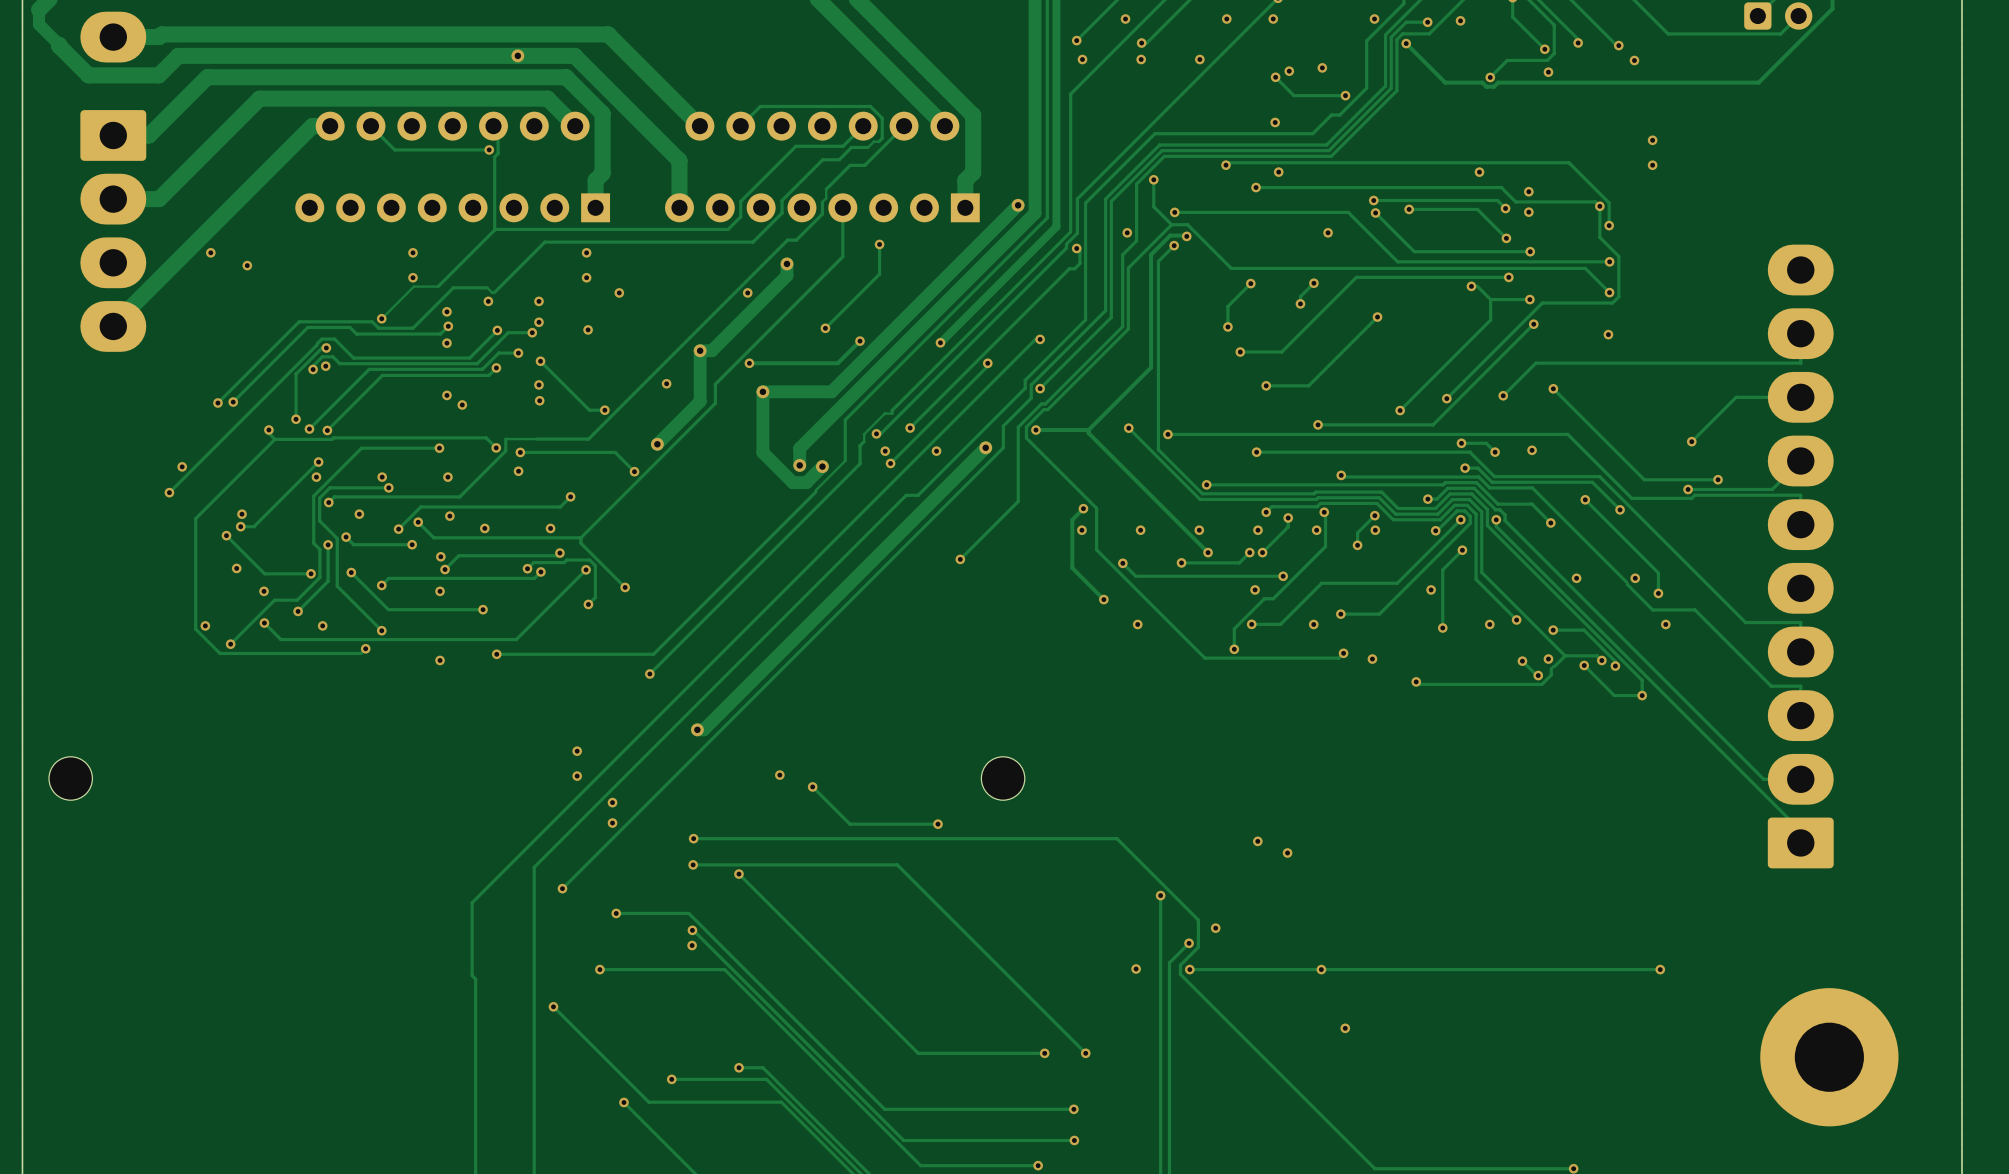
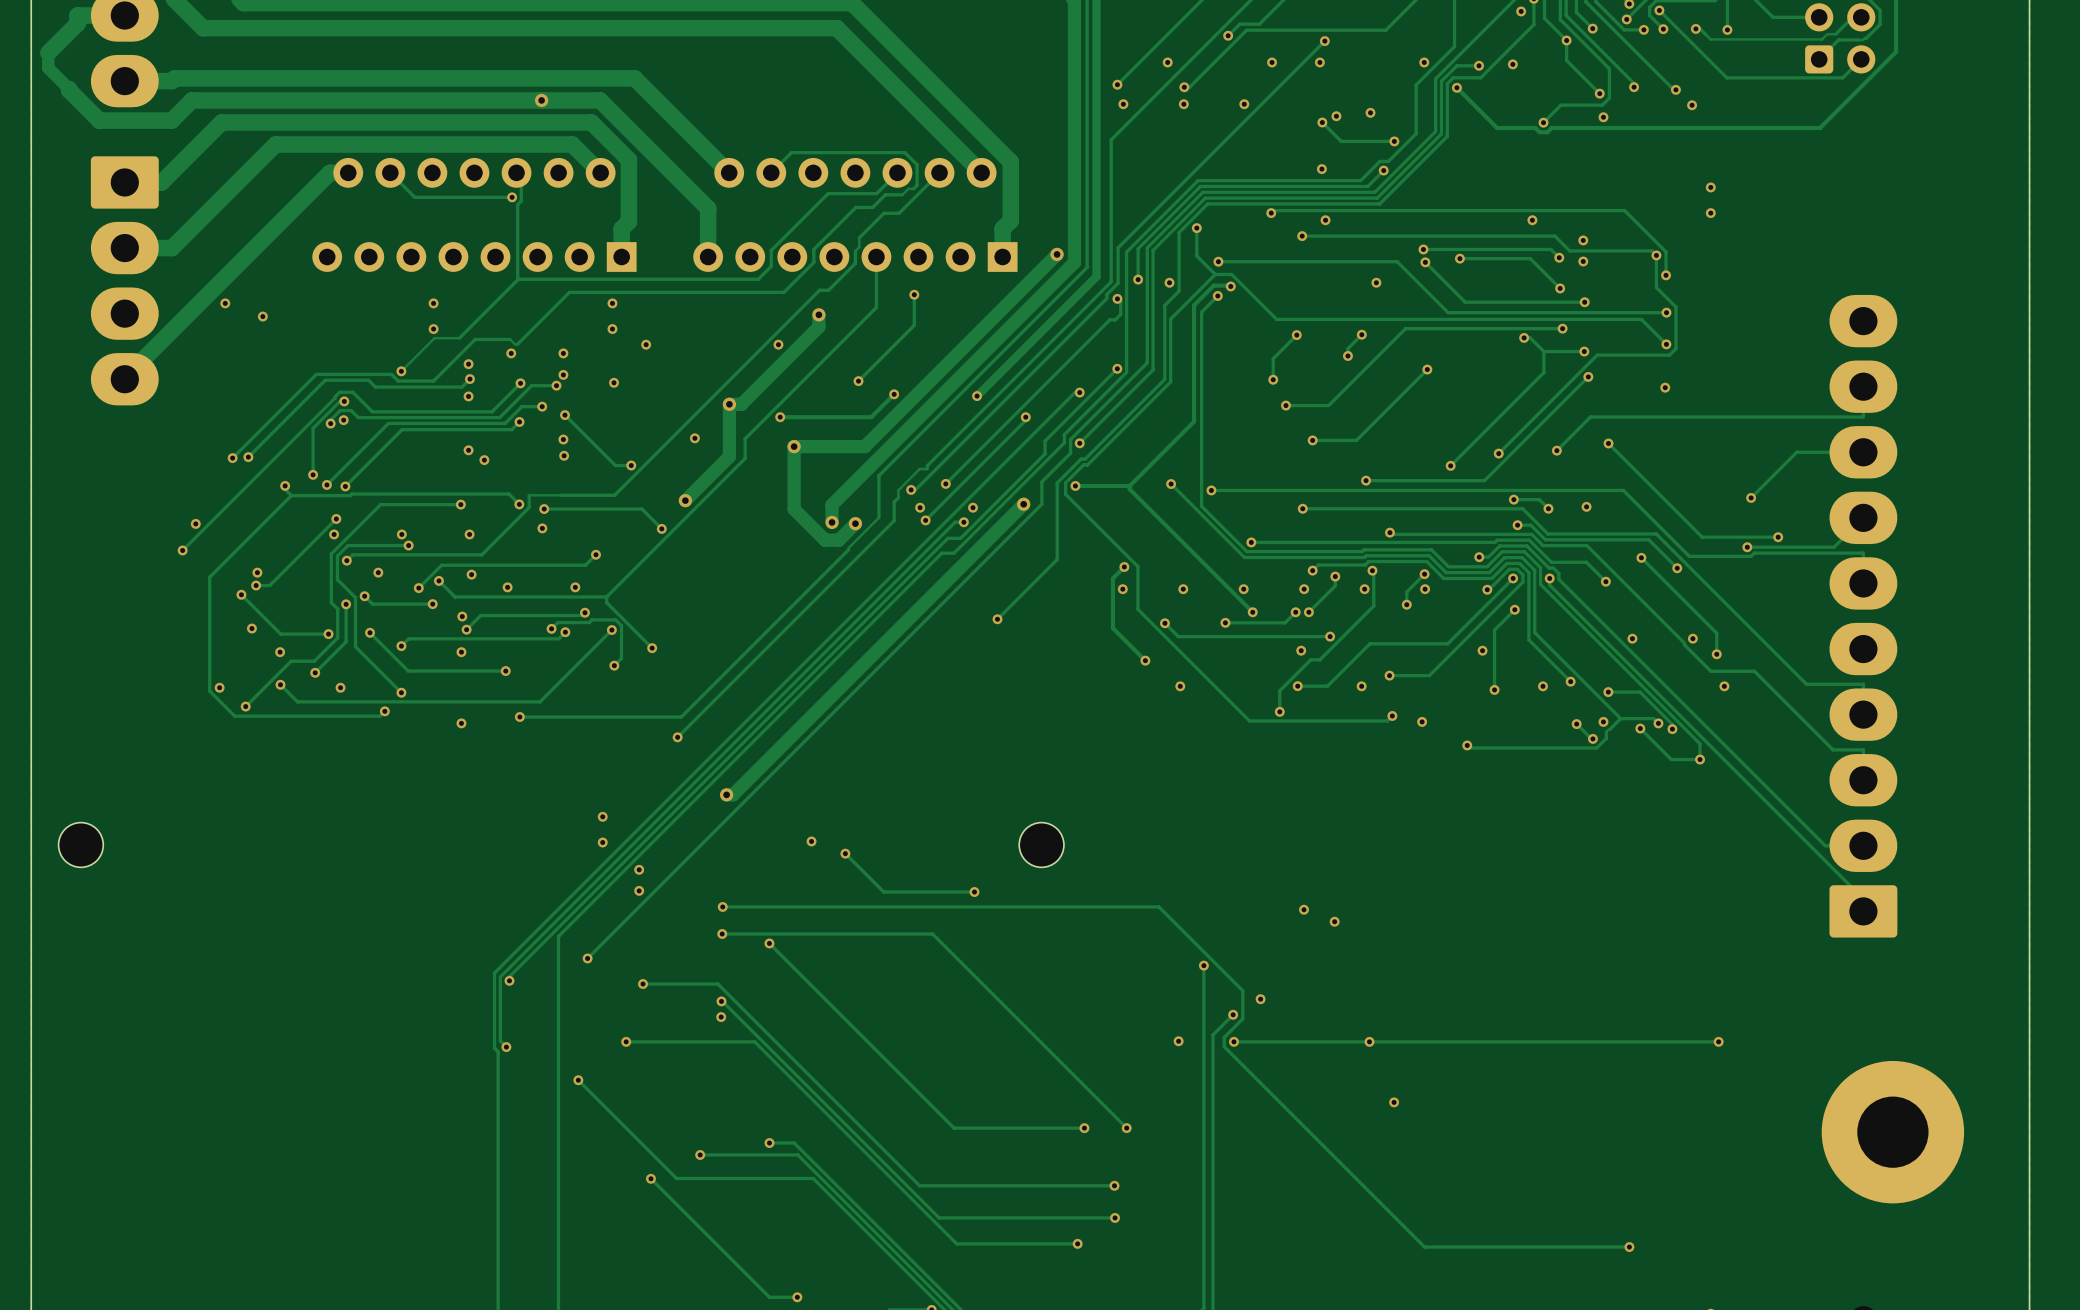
track: none -> (1383, 170) (1367, 186) (1200, 186) (1138, 248) (1138, 279)
via: none -> (1383, 170)
via: none -> (1138, 279)
track: none -> (1117, 368) (1045, 441) (1045, 453) (960, 538) (947, 538) (509, 976) (509, 980)
via: none -> (1117, 368)
track: none -> (963, 522) (955, 522) (500, 977) (500, 1041) (506, 1047)
via: none -> (963, 522)
via: none -> (509, 980)
via: none -> (506, 1047)

